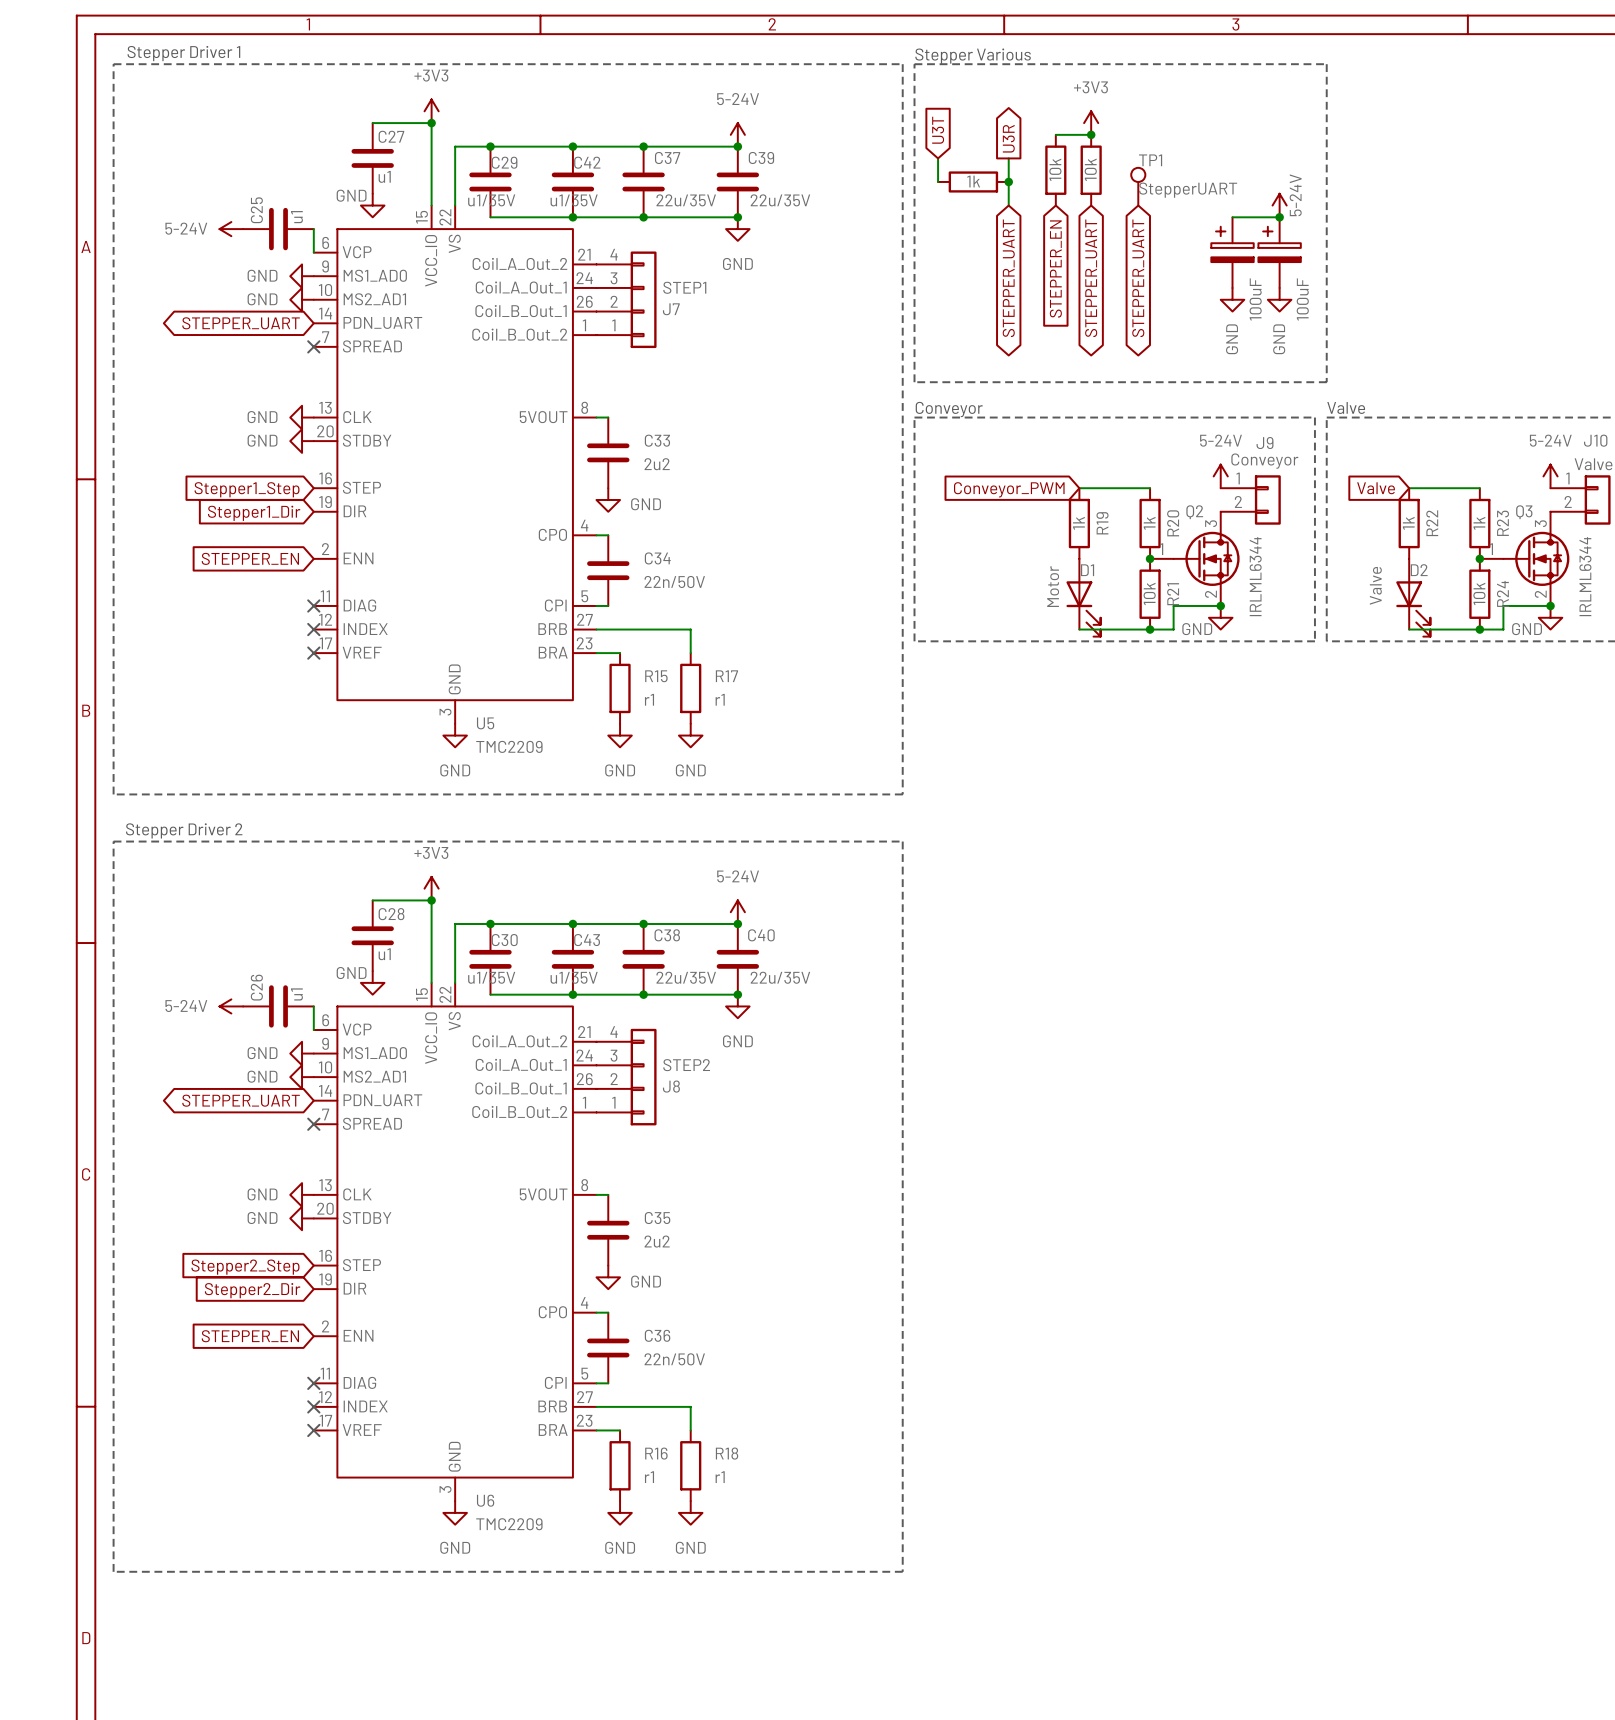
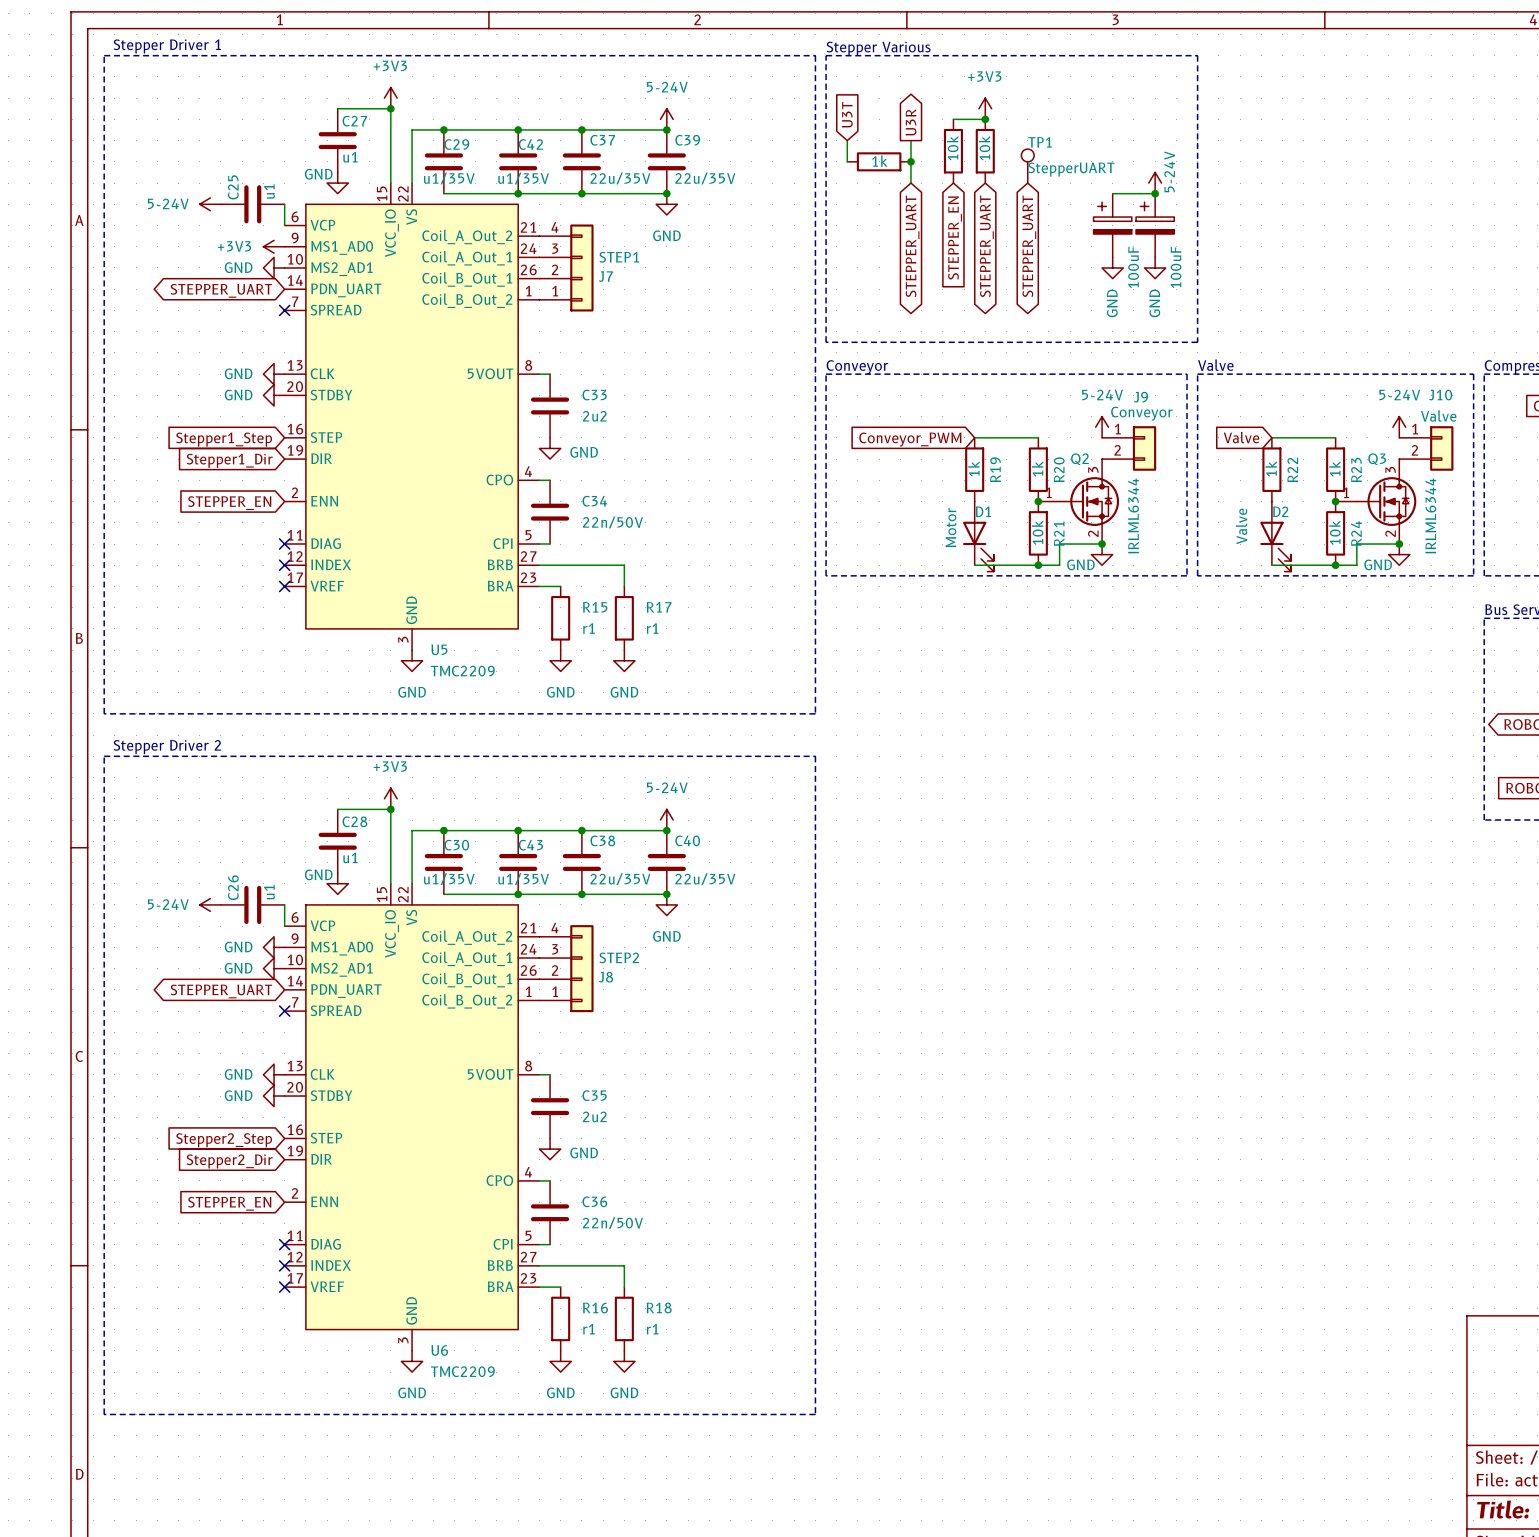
power symbol: GND (302, 276) -> +3V3 (274, 246)

